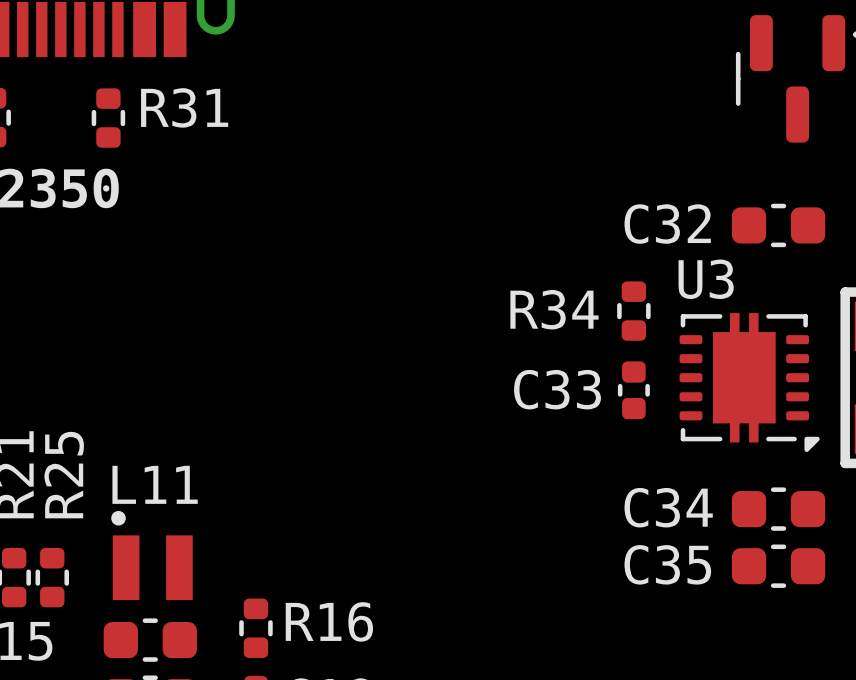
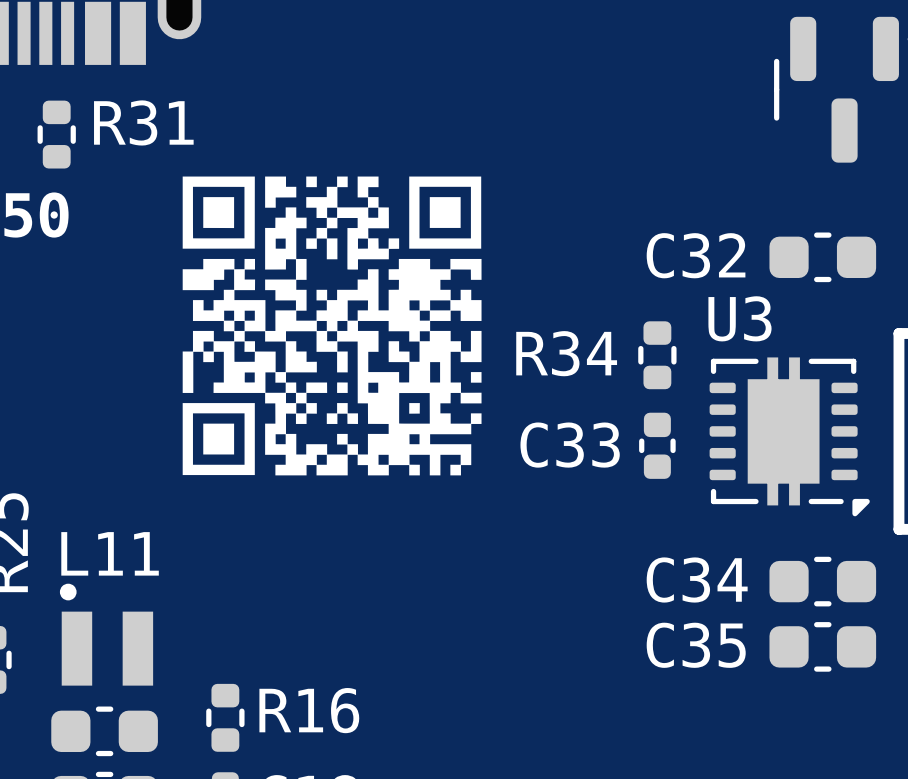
drawing: none -> [182, 176, 482, 476]

